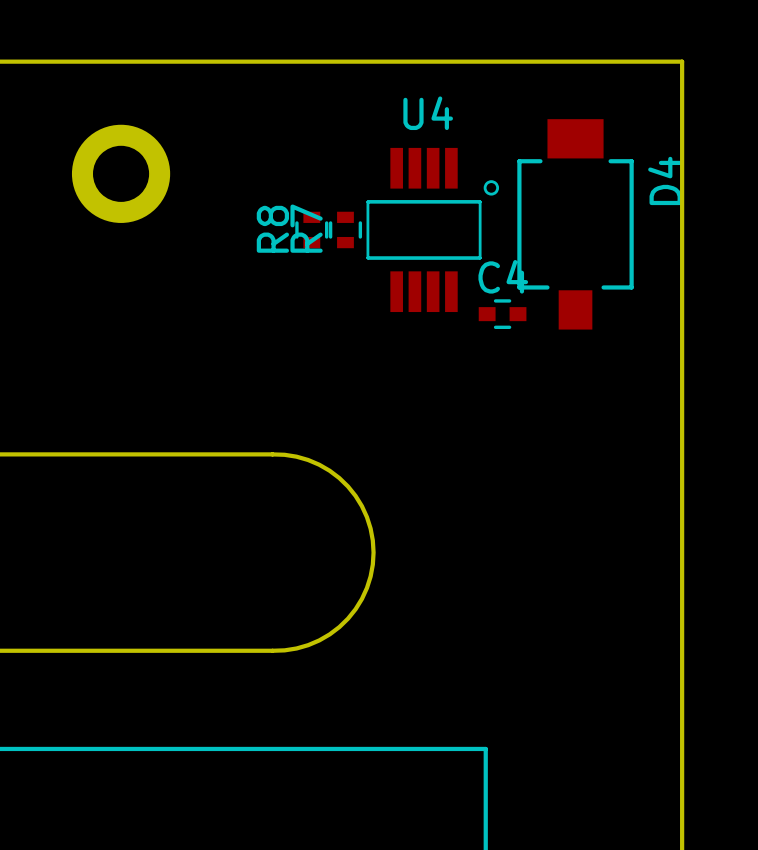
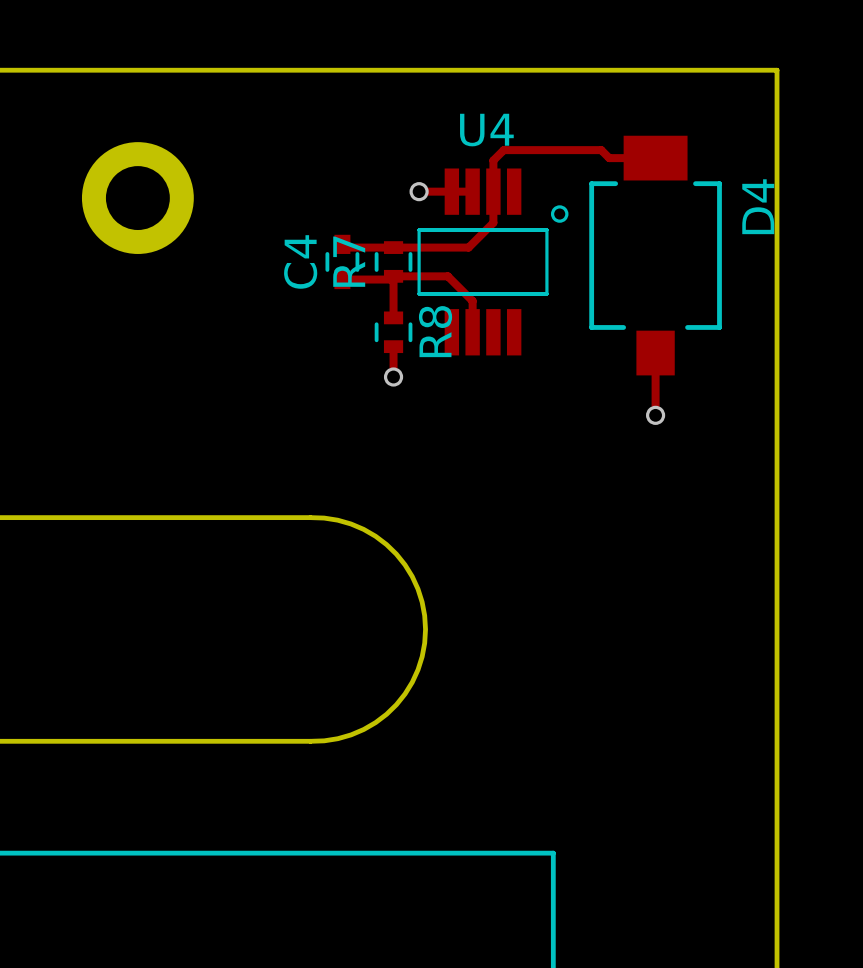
track: none -> (655, 158) (609, 158) (601, 150) (503, 150) (493, 160) (493, 222) (468, 247) (345, 247) (342, 244)
track: none -> (419, 191) (472, 191)
via: none -> (419, 191)
R8 name position: R8 (272, 229) -> R8 (435, 331)
R8 position: (311, 229) -> (393, 332)
track: none -> (393, 276) (393, 317)
track: none -> (393, 276) (390, 279) (342, 279)
track: none -> (393, 276) (447, 276) (472, 301) (472, 332)
track: none -> (393, 346) (393, 377)
C4 rotation: 0° (502, 314) -> 90° clockwise (342, 261)
C4 position: (502, 314) -> (342, 261)
track: none -> (650, 357) (655, 353) (655, 415)
via: none -> (393, 377)
via: none -> (655, 415)

